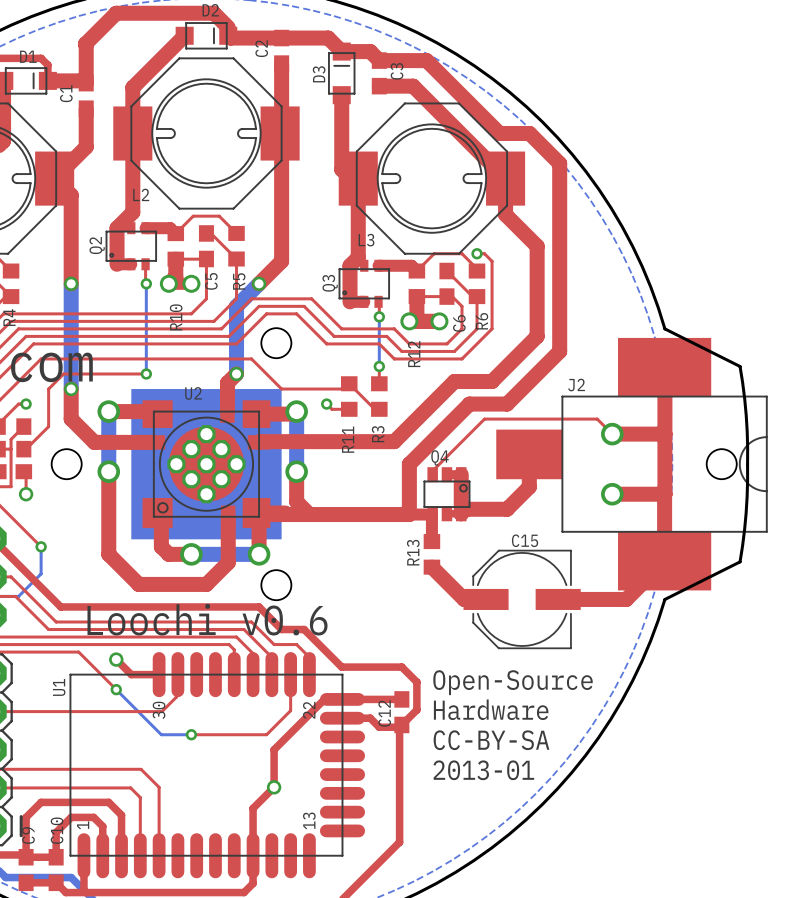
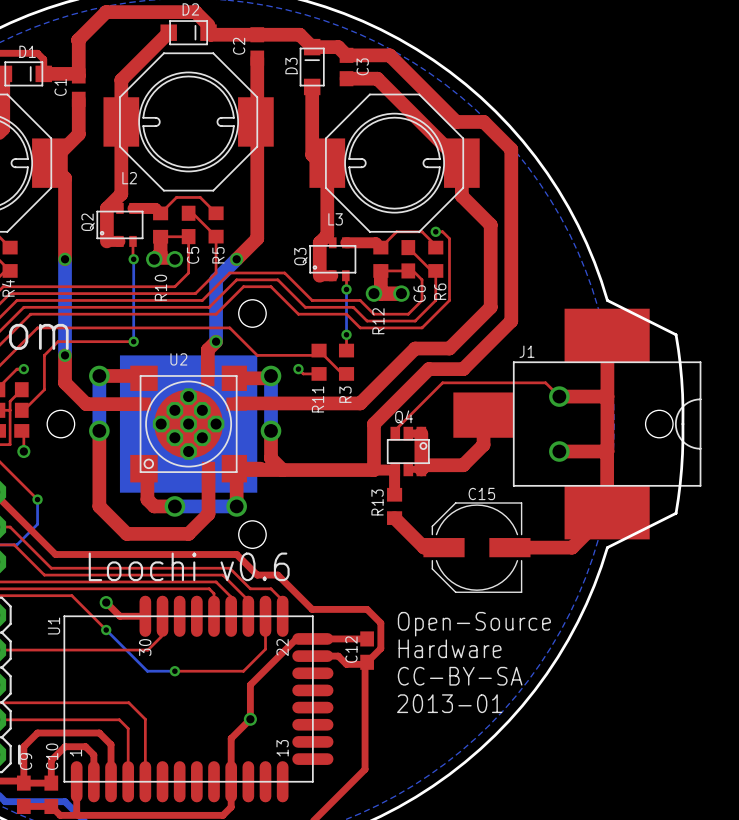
J2 name: J2 (576, 385) -> J1 (526, 351)

